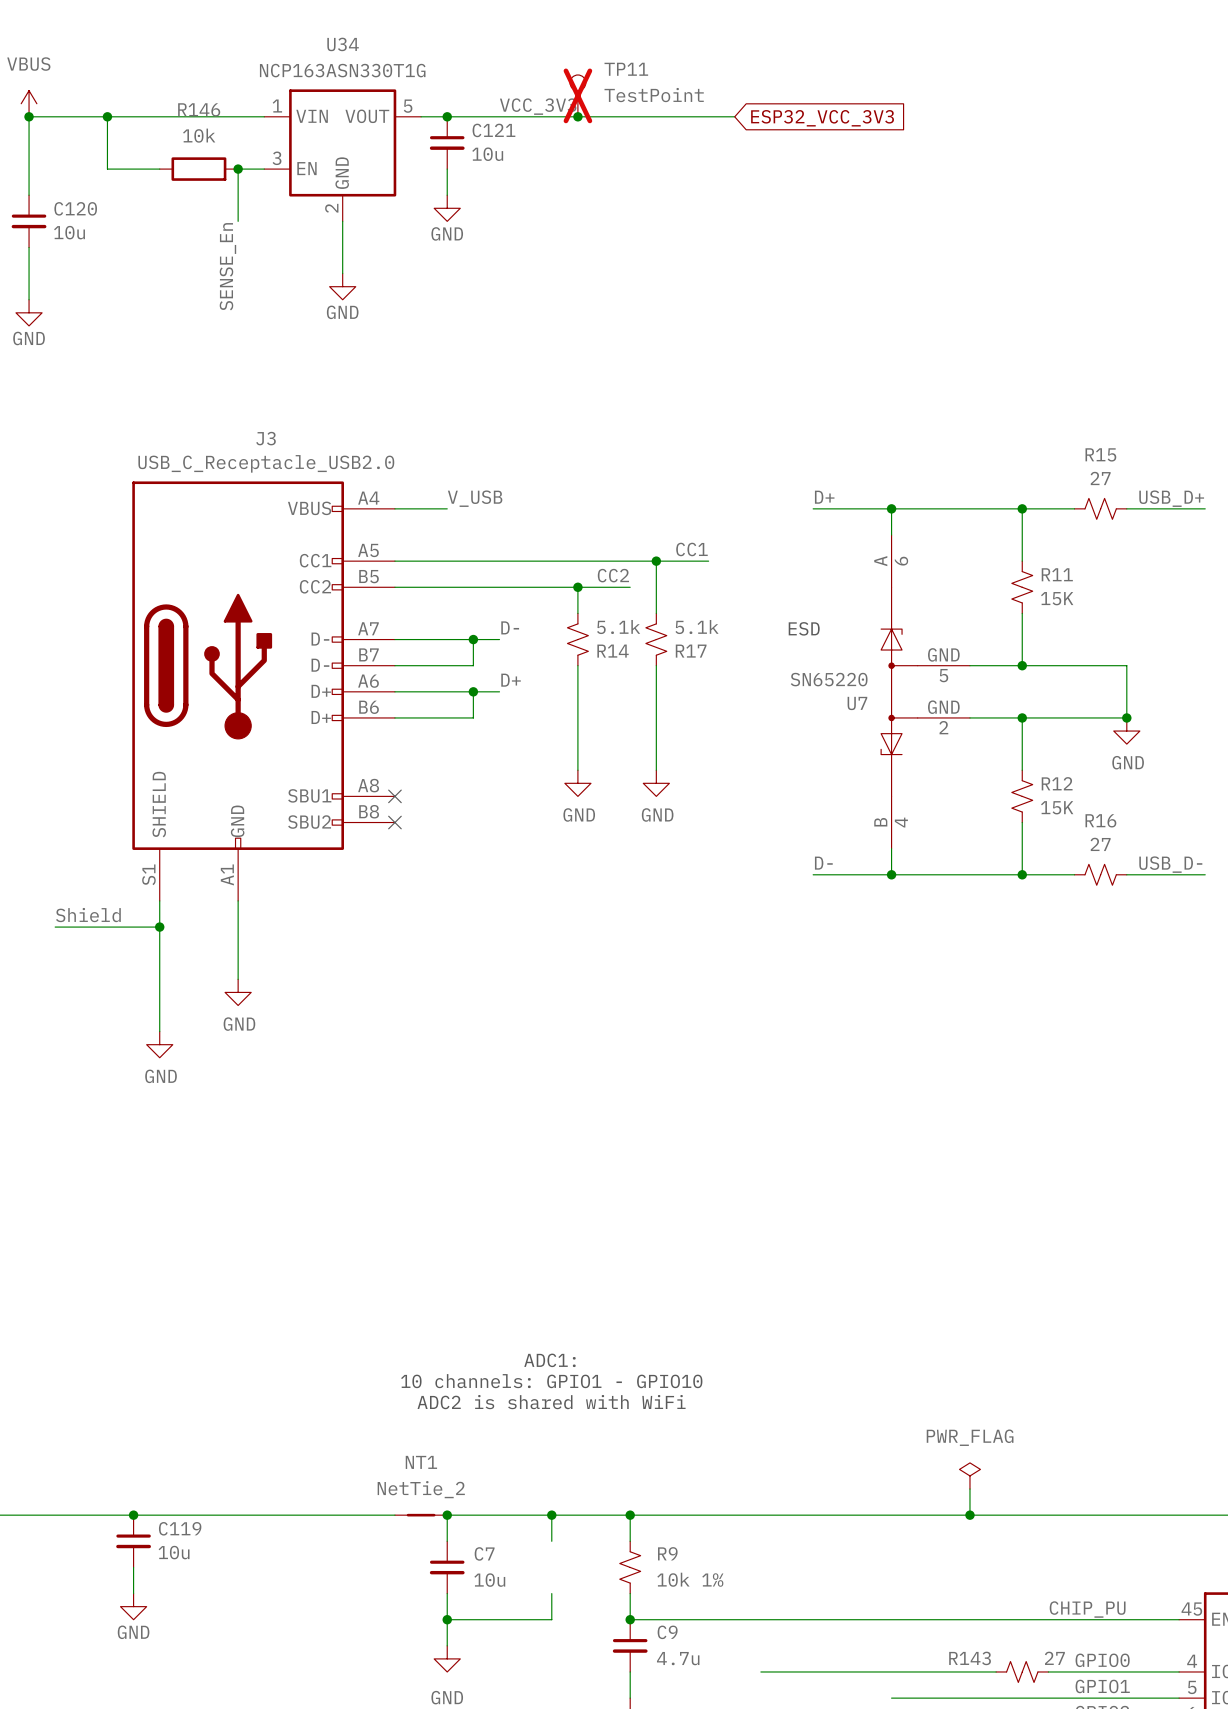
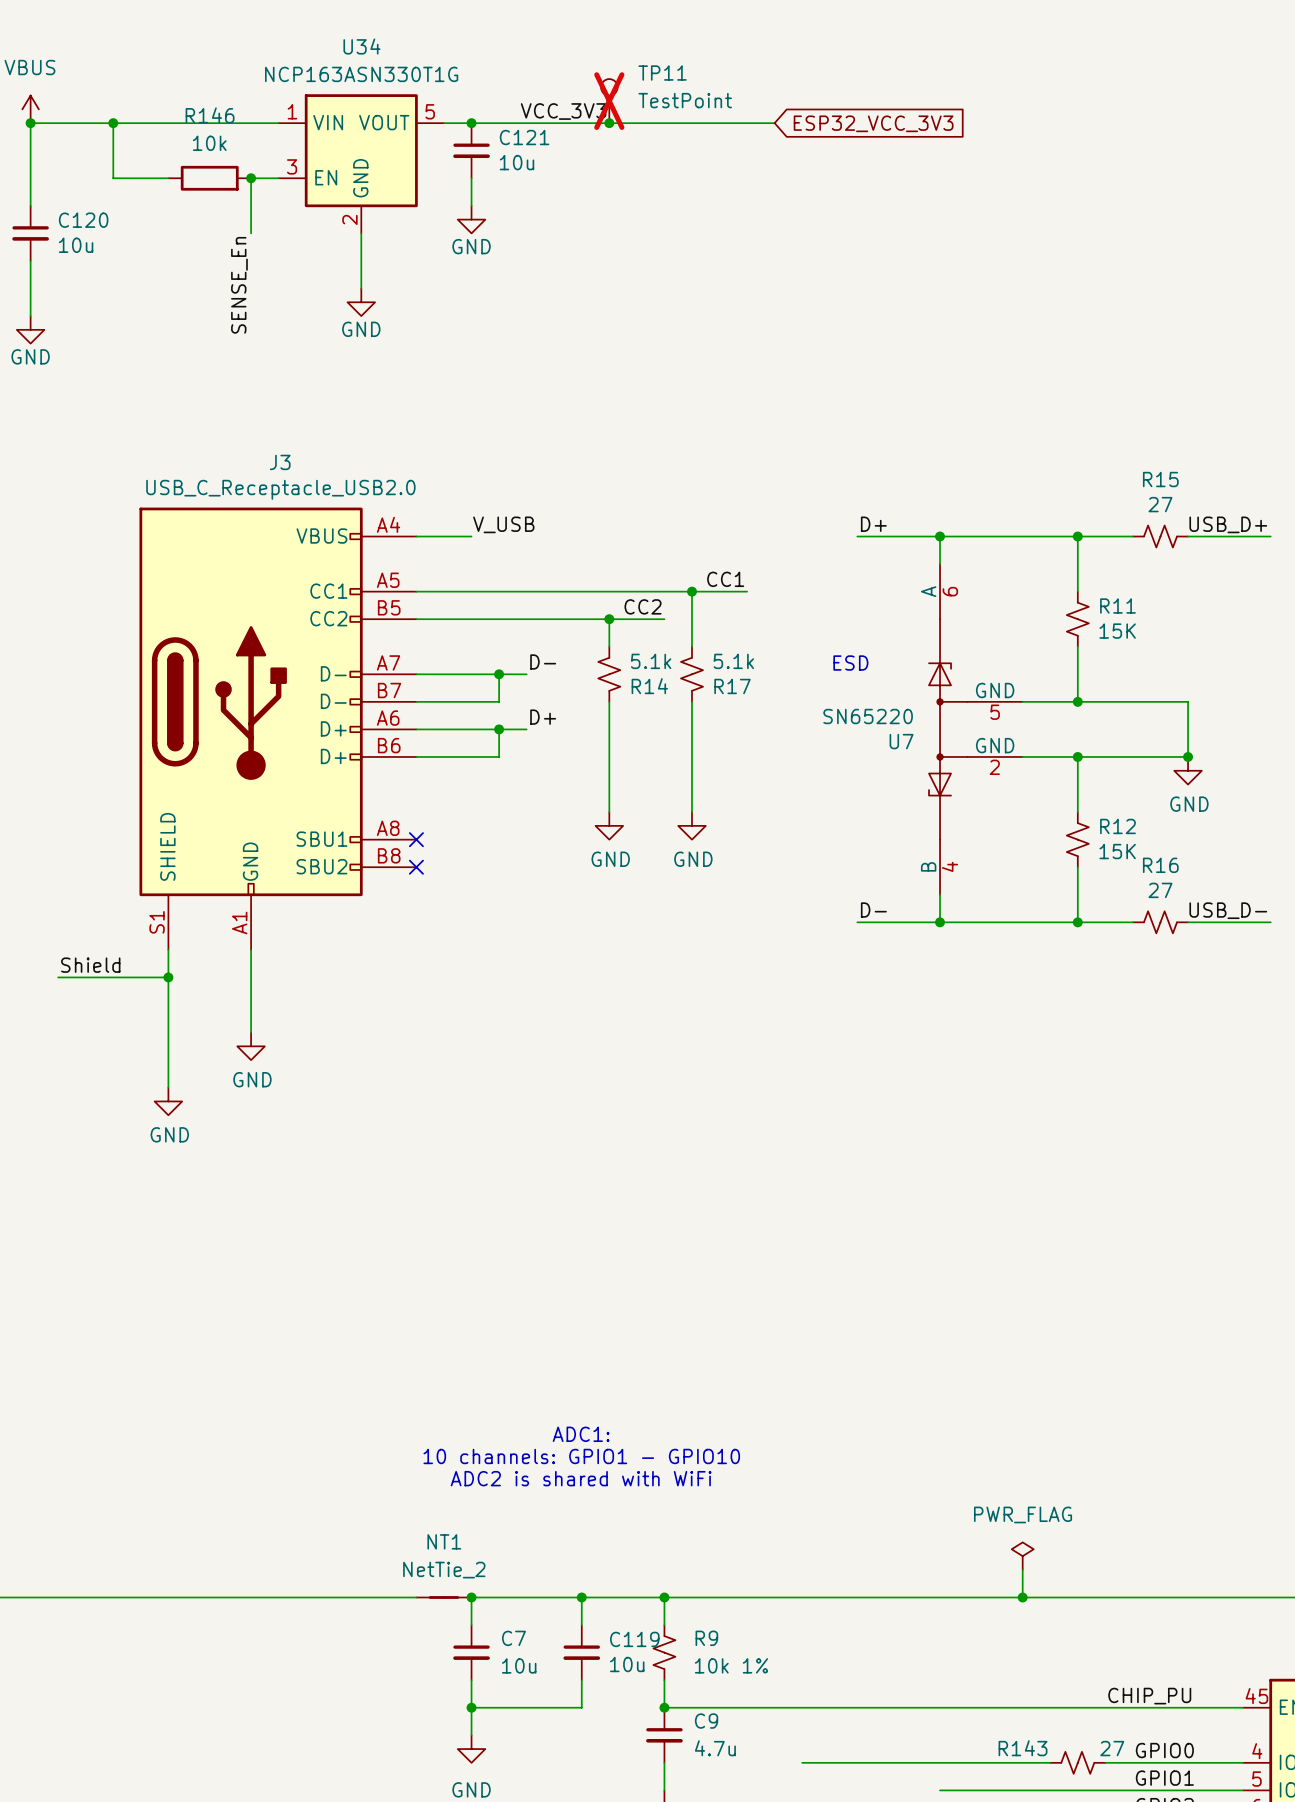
junction: (133, 1515) -> none
C119 position: (133, 1541) -> (581, 1652)
wire: (133, 1567) (133, 1593) -> none
power symbol: GND (133, 1606) -> none

